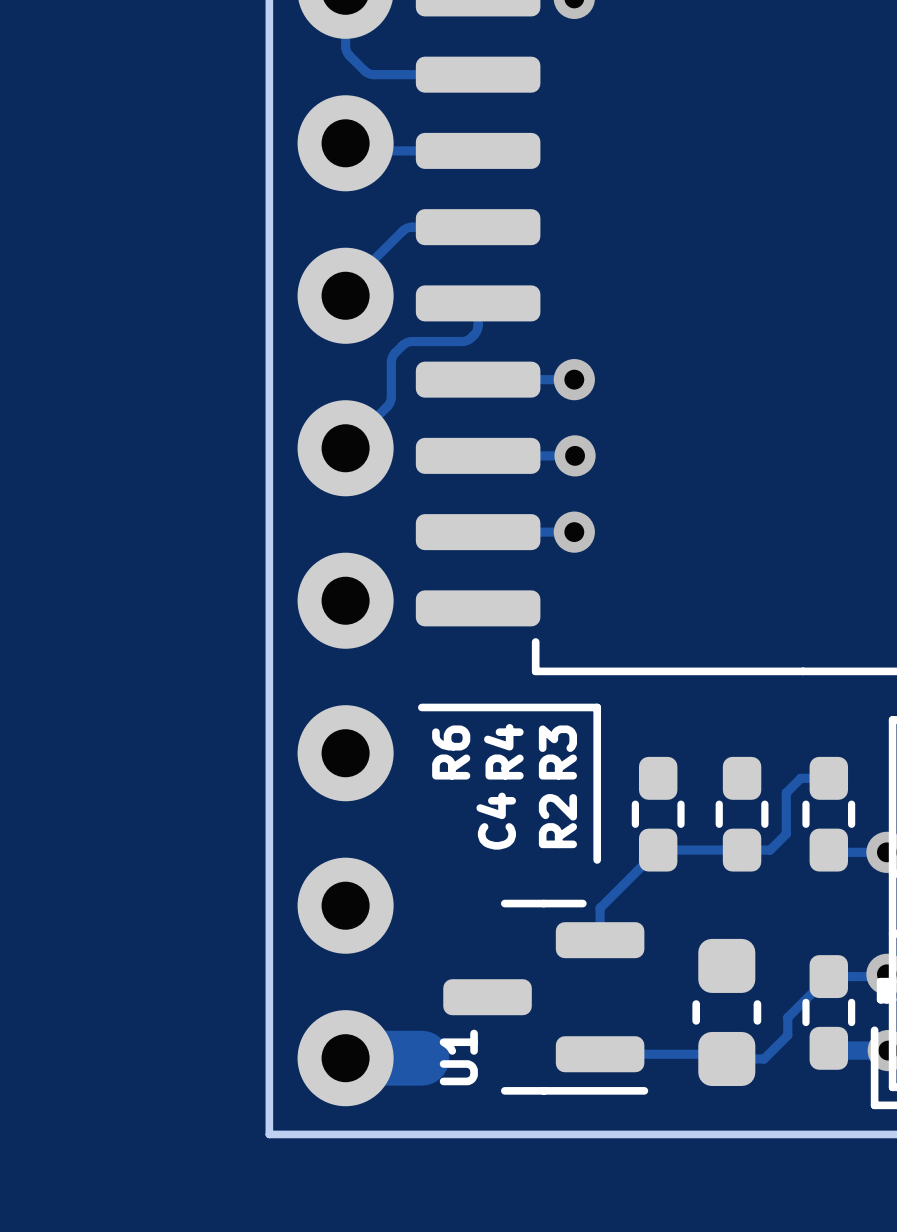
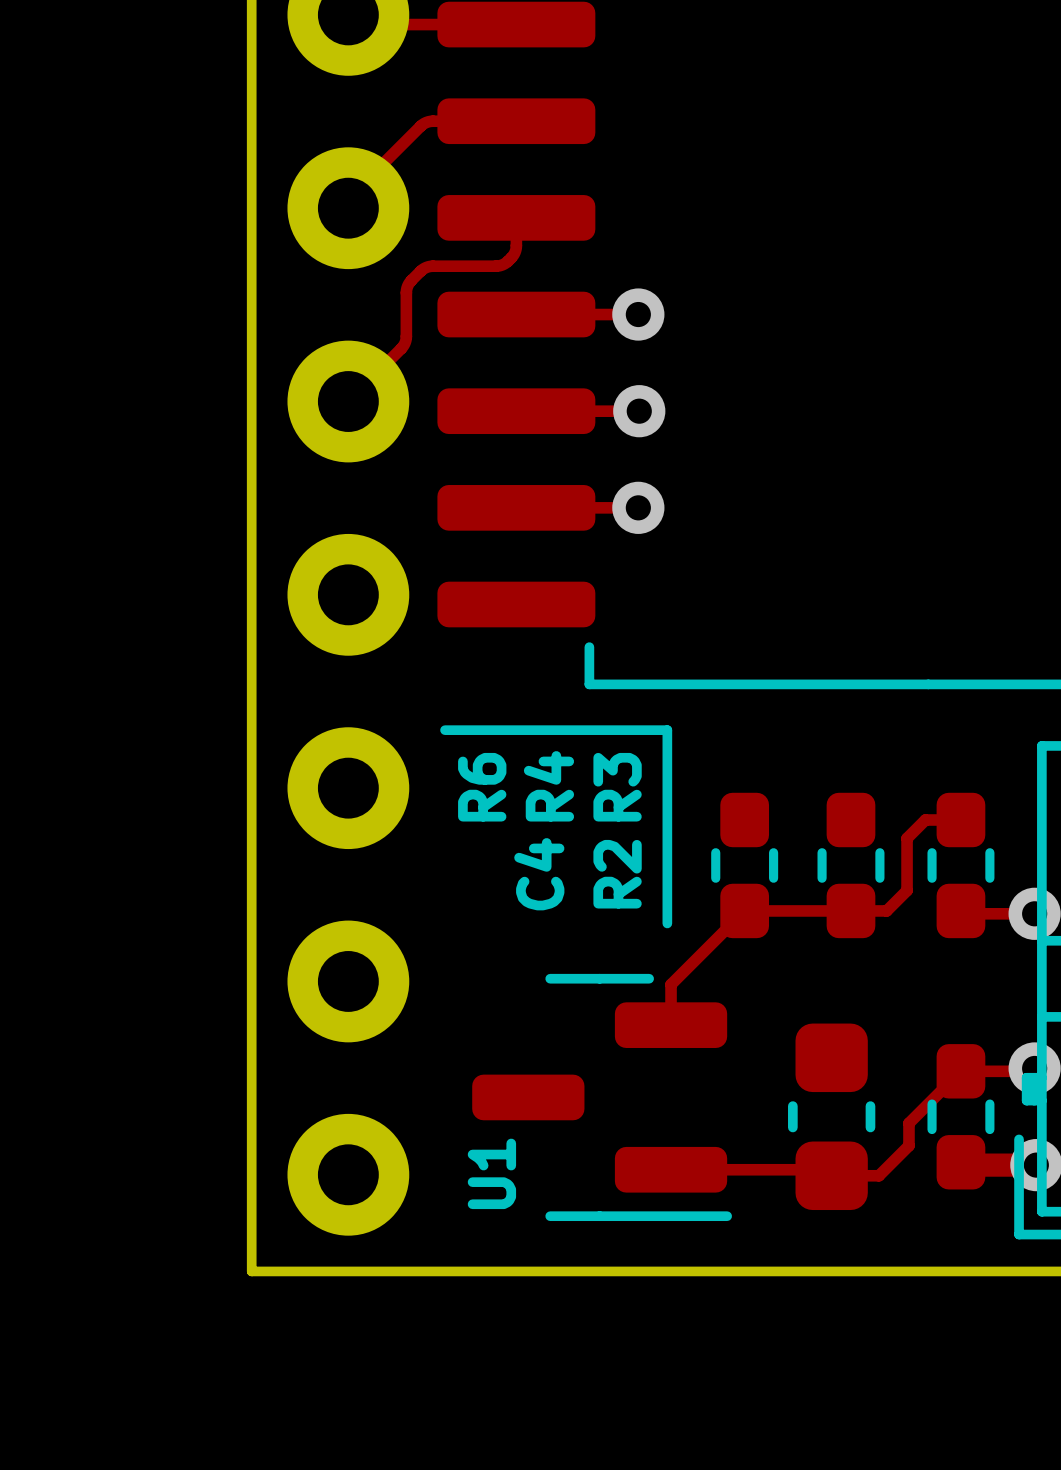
track: (345, 1058) (421, 1058) -> none

